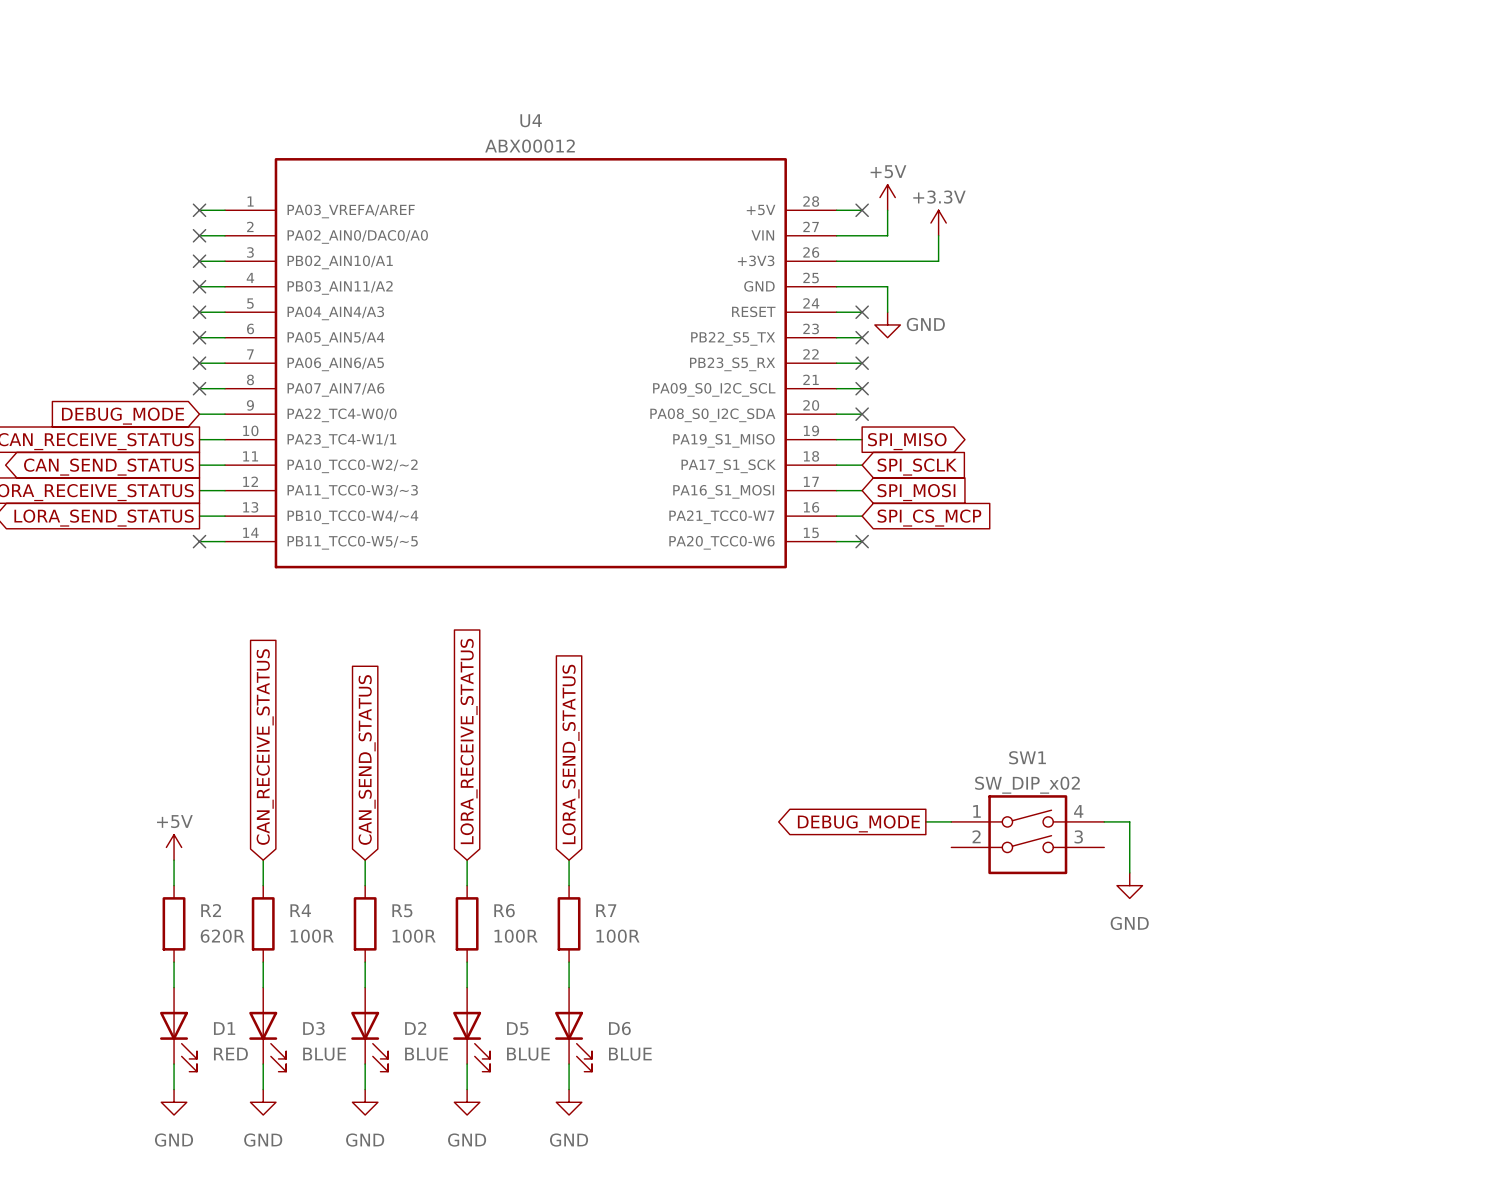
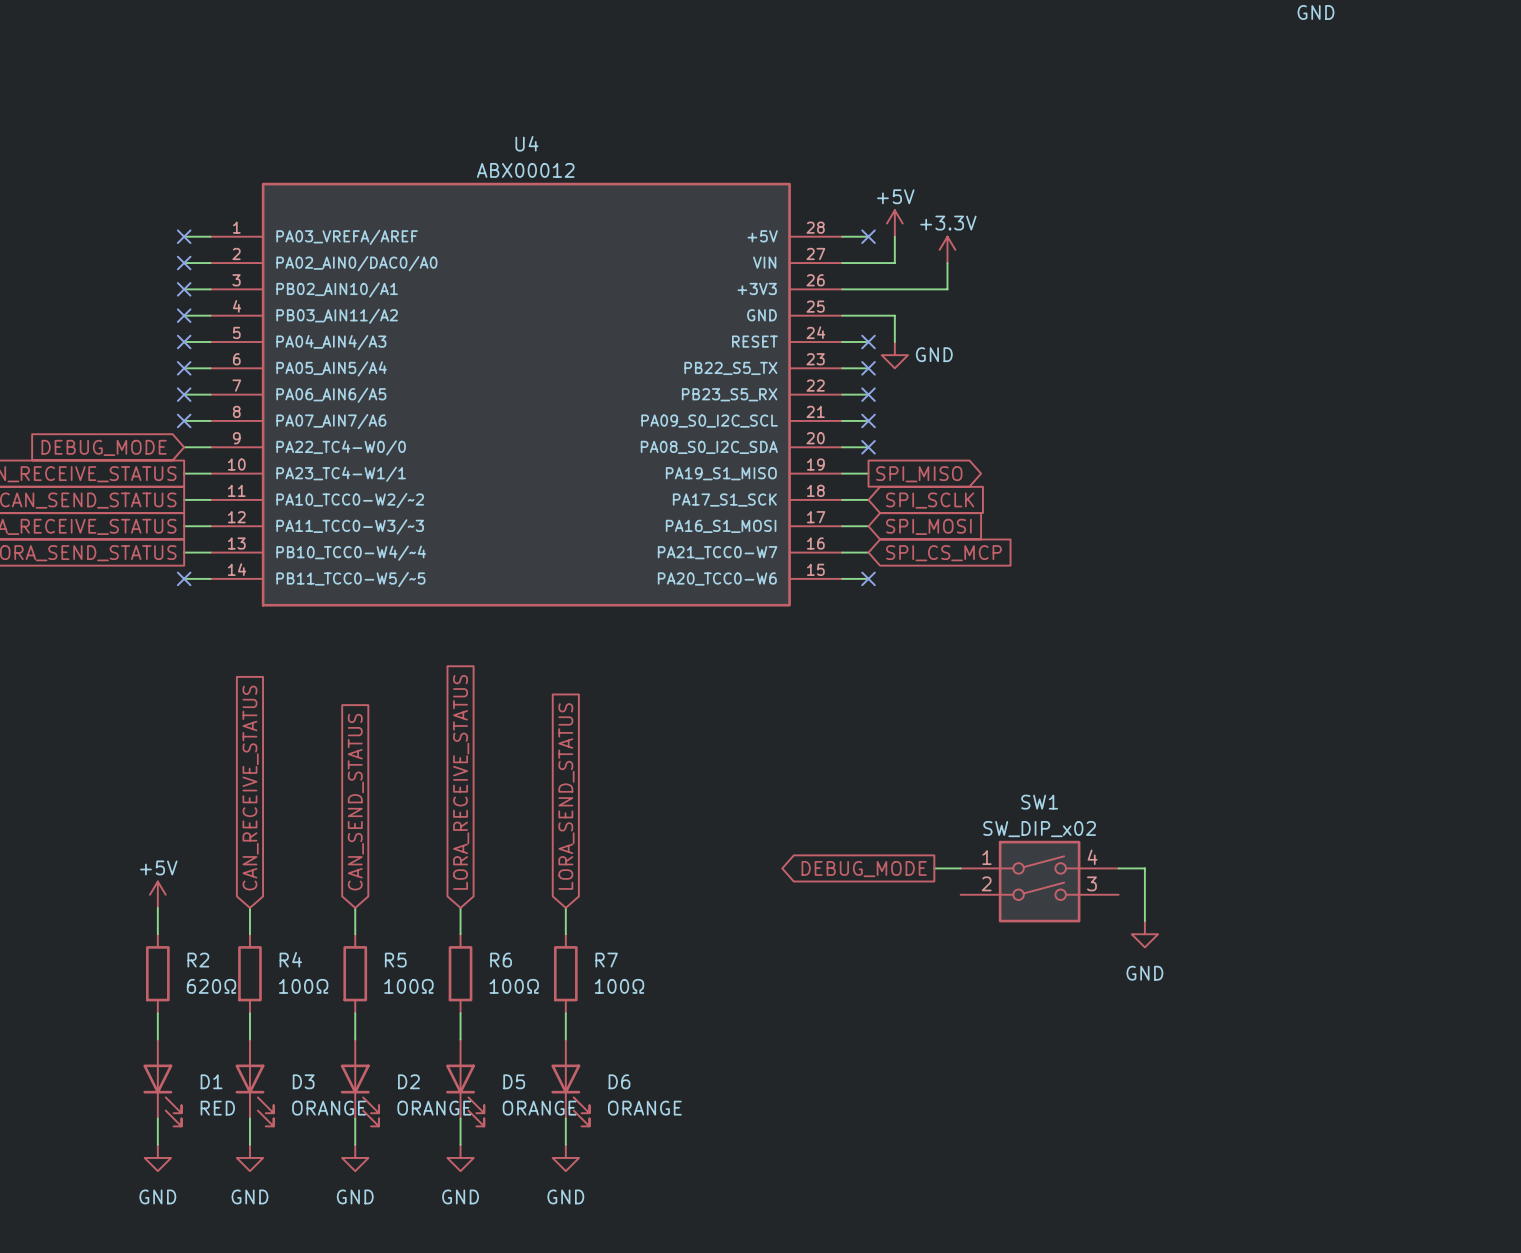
R2 value: 620R (222, 936) -> 620Ω (211, 986)
R4 value: 100R (312, 936) -> 100Ω (303, 986)
R5 value: 100R (414, 936) -> 100Ω (408, 986)
R6 value: 100R (516, 936) -> 100Ω (514, 986)
R7 value: 100R (618, 936) -> 100Ω (619, 986)
D3 value: BLUE (324, 1054) -> ORANGE (329, 1108)
D2 value: BLUE (426, 1054) -> ORANGE (434, 1108)
D5 value: BLUE (528, 1054) -> ORANGE (539, 1108)
D6 value: BLUE (630, 1054) -> ORANGE (644, 1108)

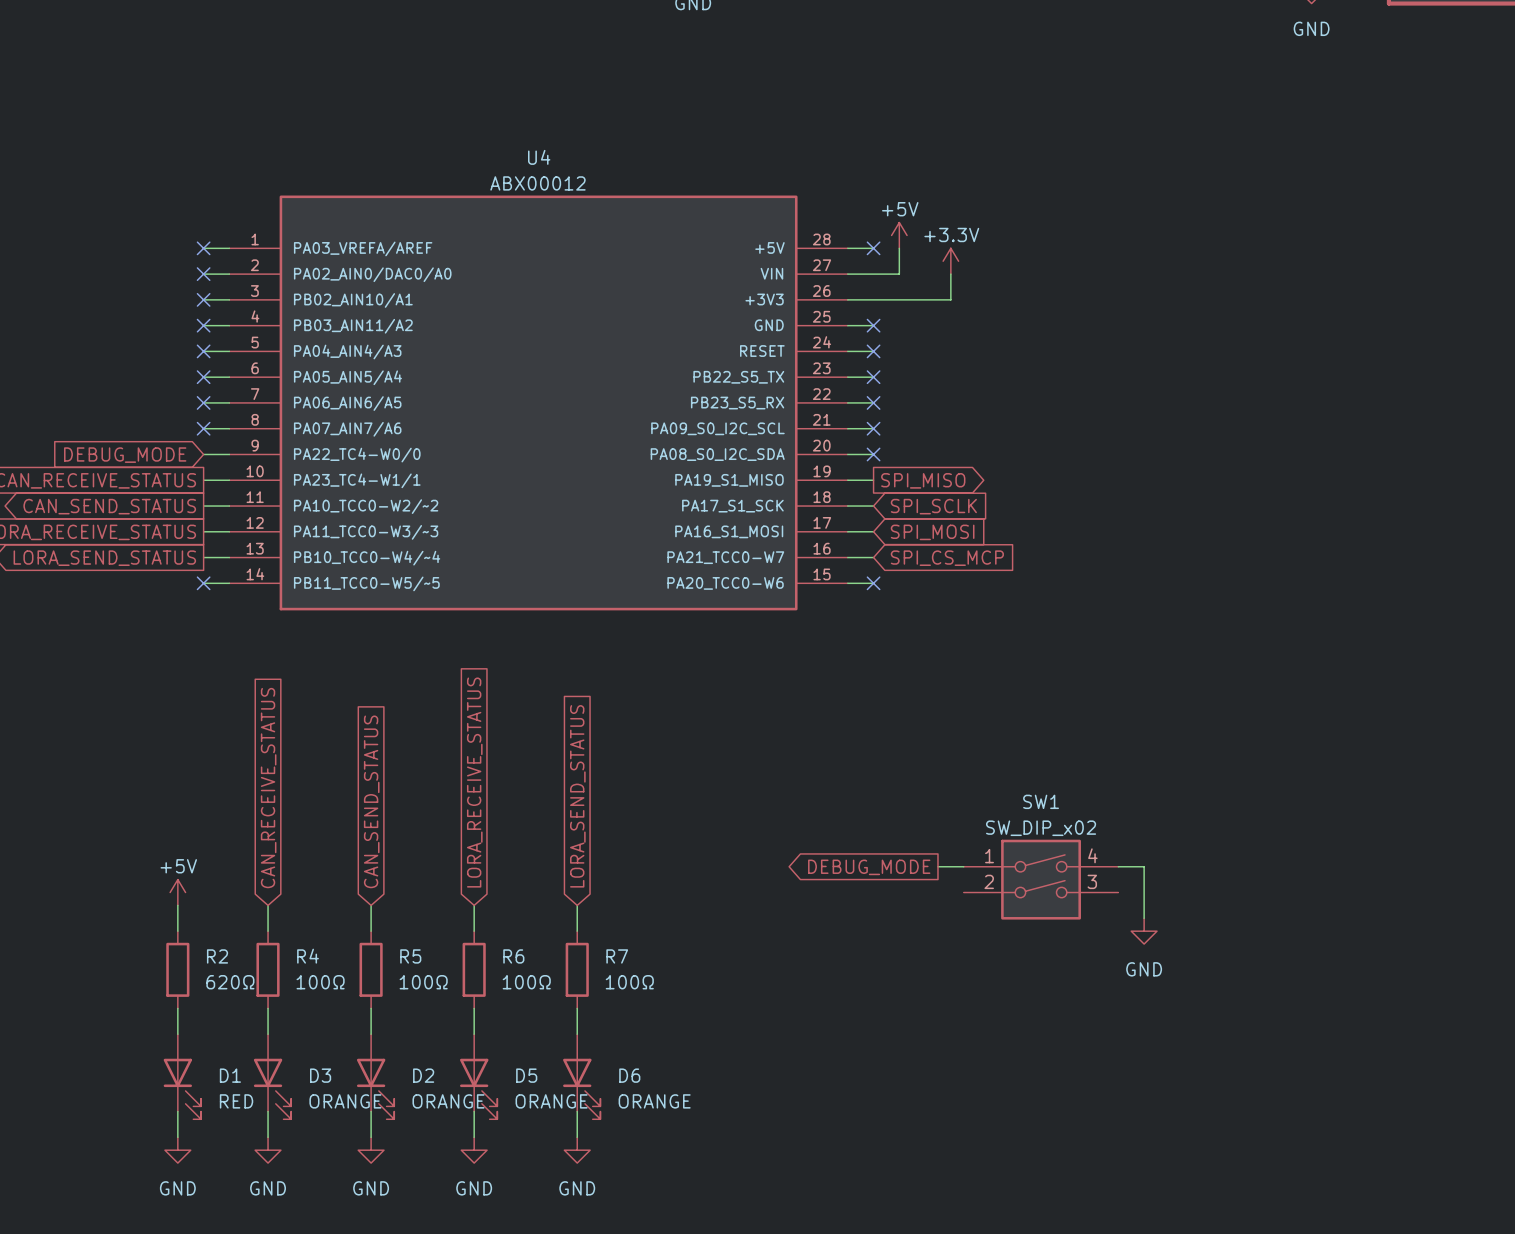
wire: (868, 315) (894, 315) (894, 342) -> none
no-connect mark: none -> (873, 325)
power symbol: GND (894, 355) -> none

